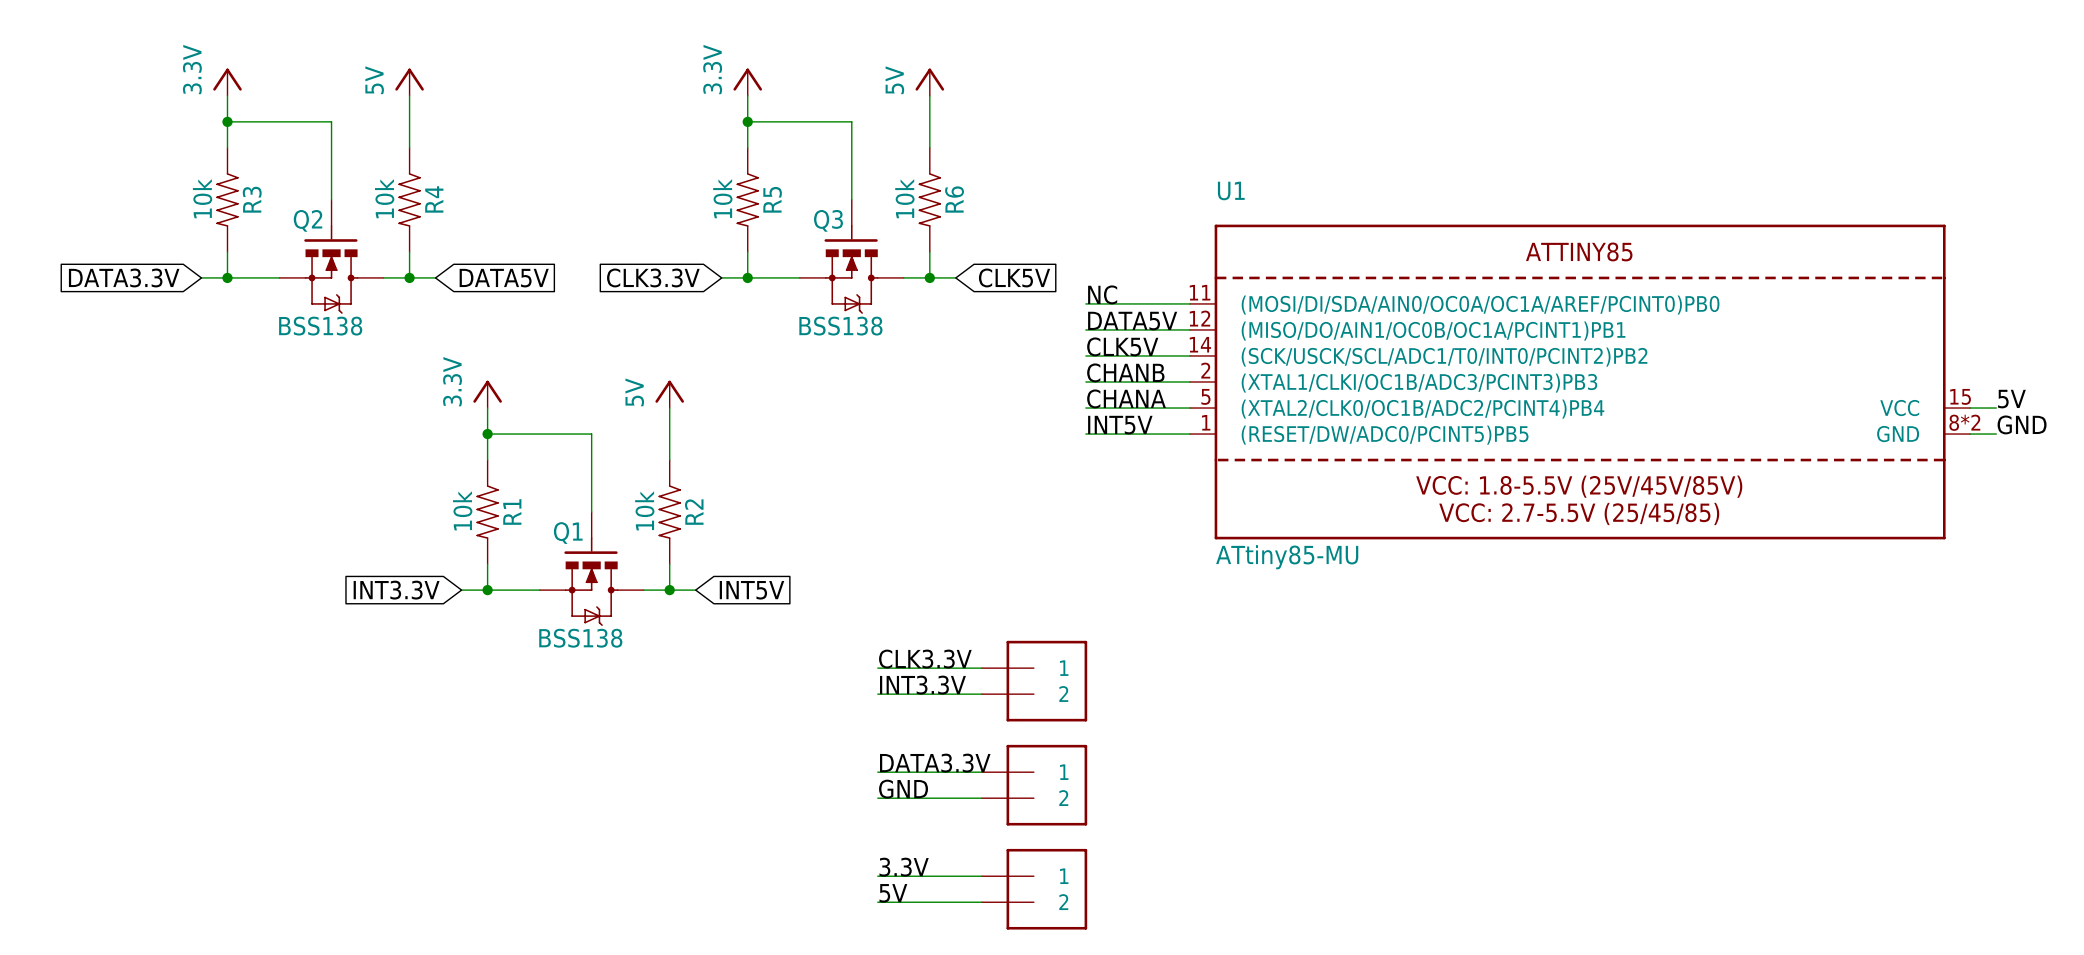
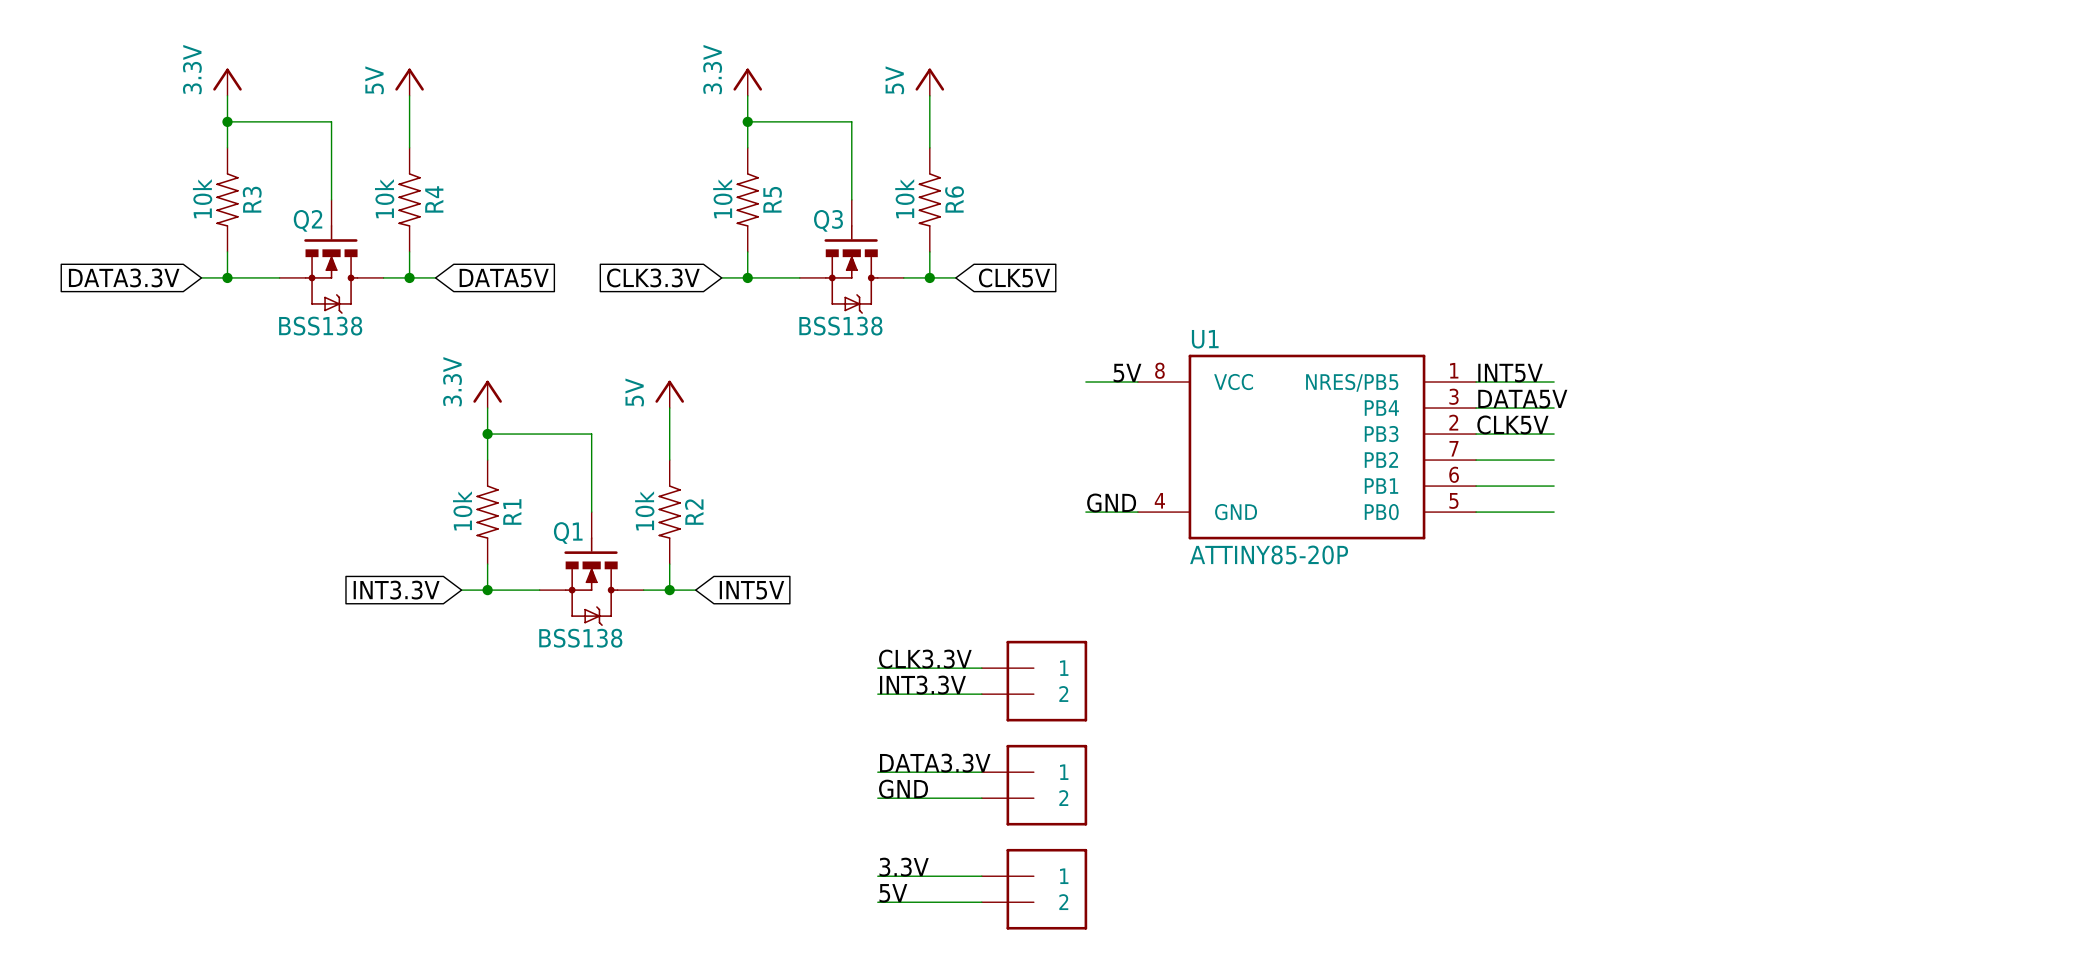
U1 name position: U1 (1231, 190) -> U1 (1205, 339)
U1 symbol: [1189, 224, 1971, 540] -> [1137, 354, 1477, 540]
label: NC (1102, 294) -> none
wire: (1085, 303) (1189, 303) -> none
label: DATA5V (1132, 321) -> none
wire: (1085, 329) (1189, 329) -> none
label: CLK5V (1122, 346) -> none
wire: (1085, 355) (1189, 355) -> none
label: CHANB (1125, 372) -> none
label: none -> 5V (1127, 373)
label: none -> INT5V (1510, 373)
wire: none -> (1476, 382) (1554, 382)
label: CHANA (1126, 398) -> none
label: none -> DATA5V (1522, 399)
label: 5V (2011, 399) -> none
wire: (1085, 408) (1189, 408) -> none
wire: none -> (1476, 408) (1554, 408)
wire: (1970, 408) (1996, 408) -> none
label: none -> CLK5V (1512, 424)
label: GND (2022, 424) -> none
label: INT5V (1120, 425) -> none
wire: (1085, 434) (1189, 434) -> none
wire: none -> (1476, 434) (1554, 434)
wire: (1970, 434) (1996, 434) -> none
wire: none -> (1476, 486) (1554, 486)
label: none -> GND (1111, 502)
wire: none -> (1476, 512) (1554, 512)
U1 value: ATtiny85-MU (1287, 557) -> ATTINY85-20P (1269, 554)

